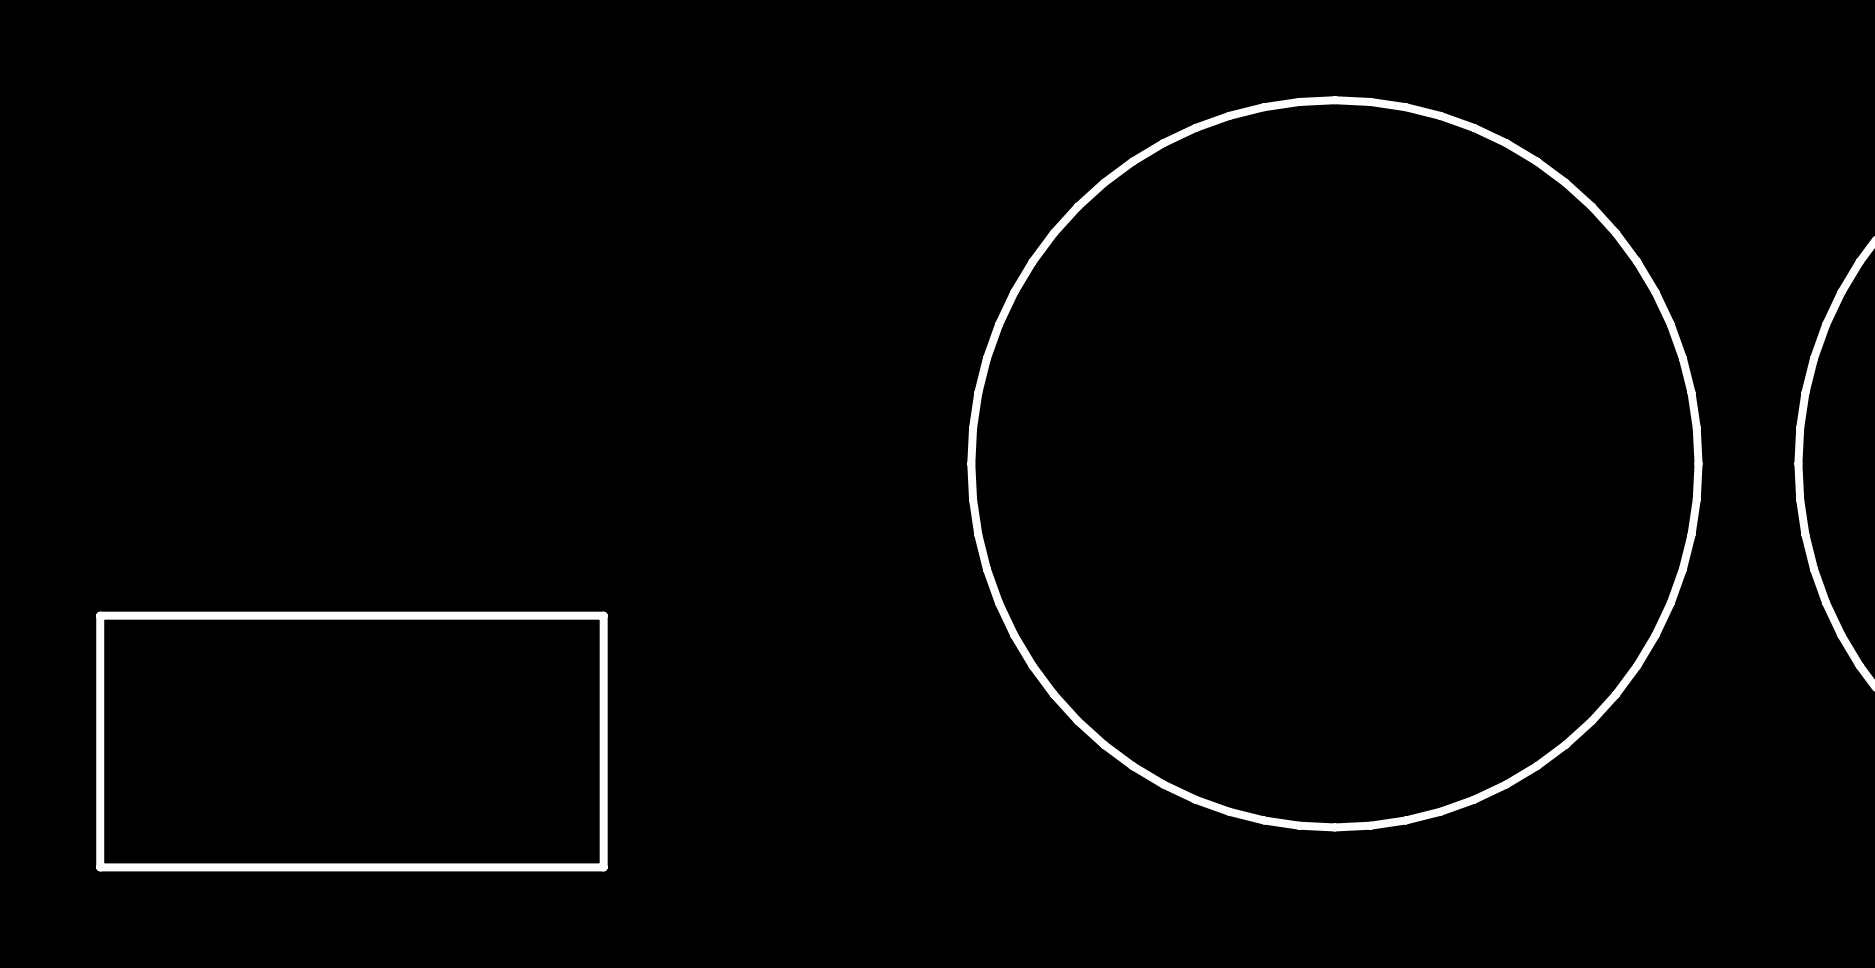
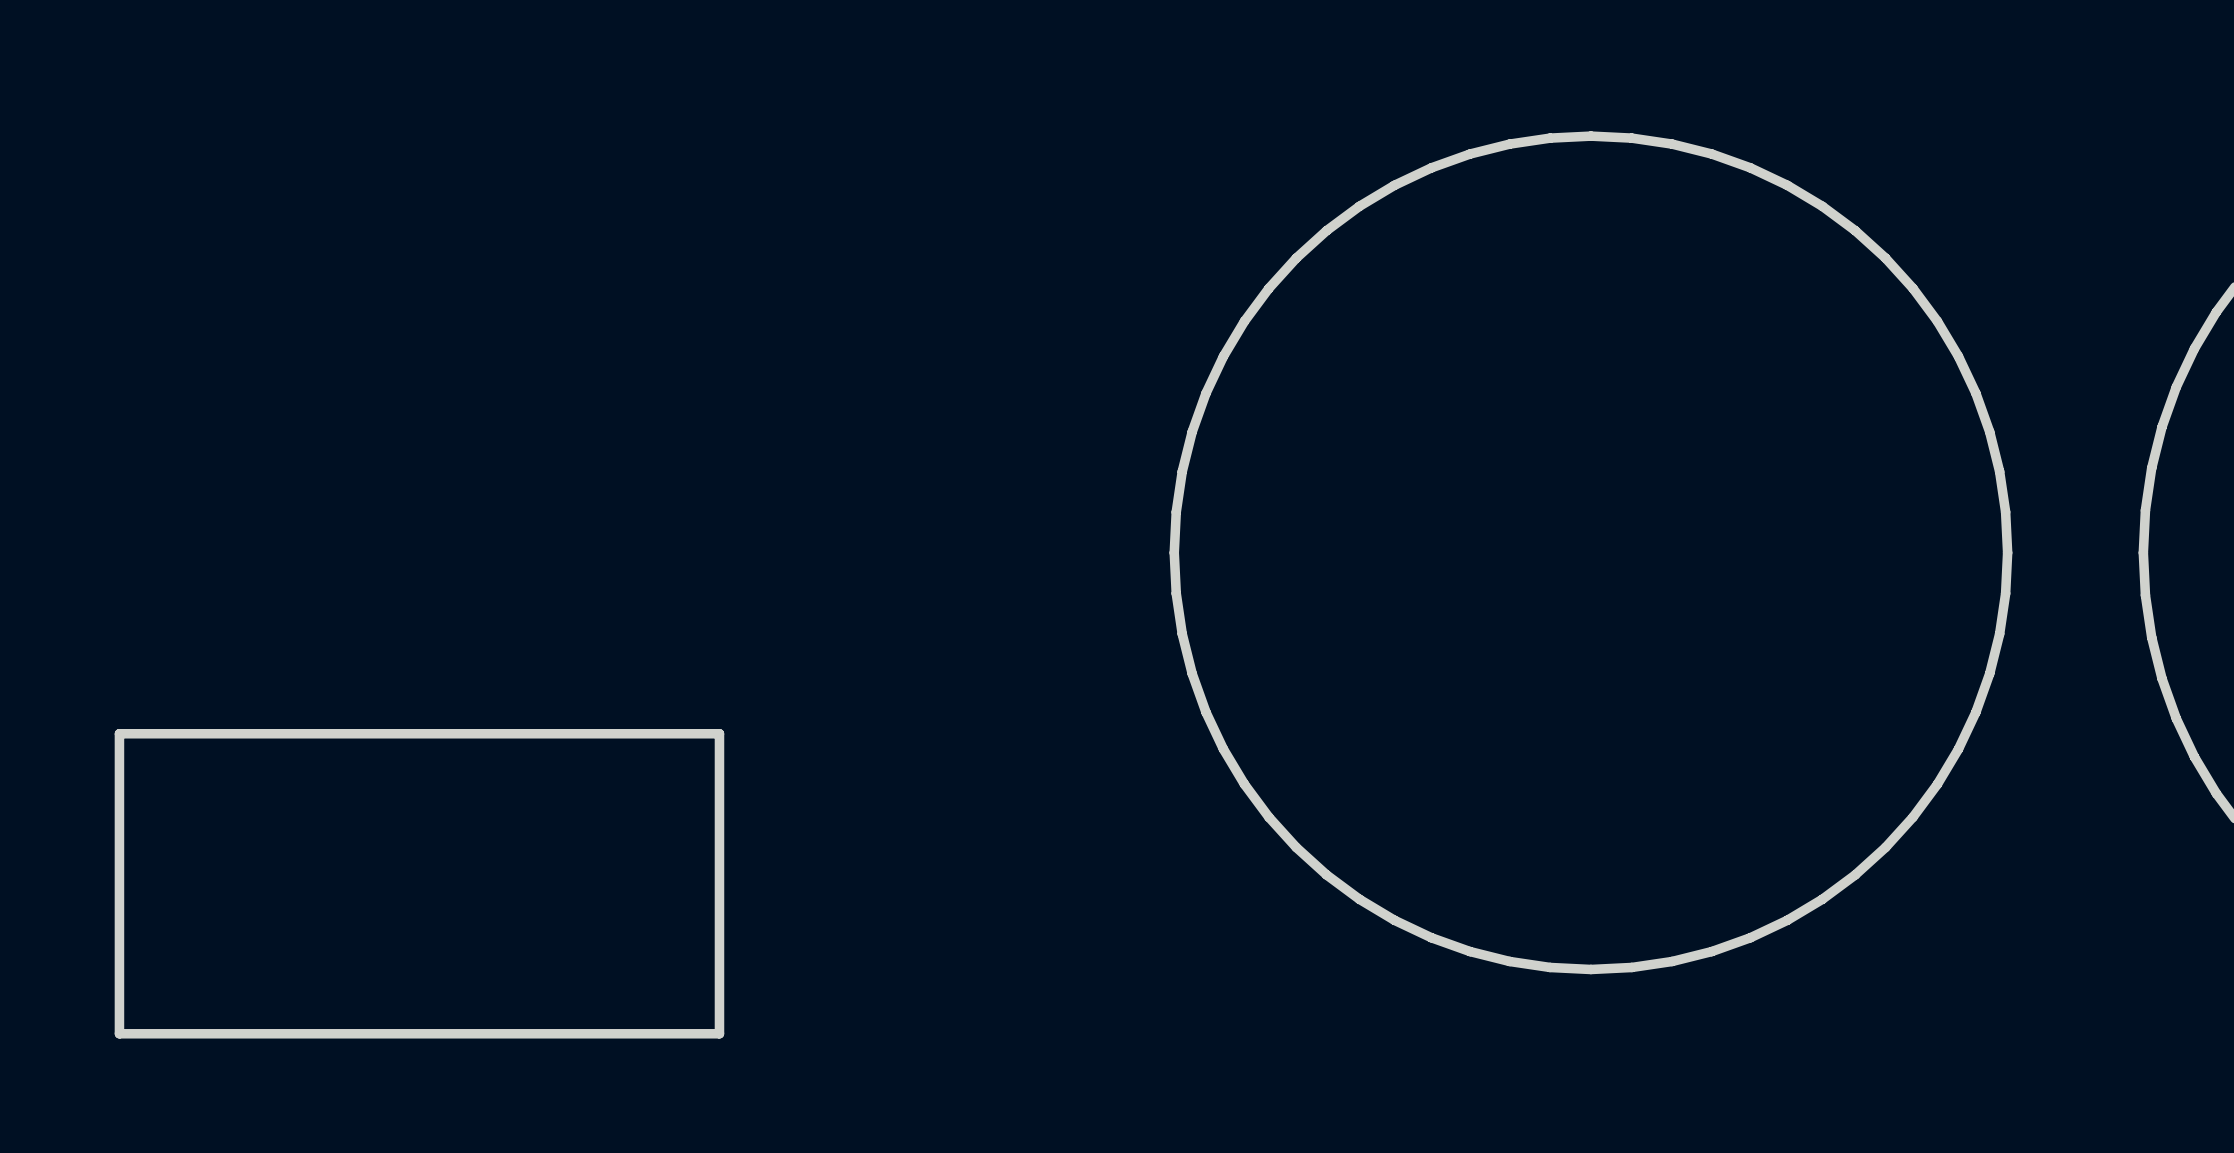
board edge: (1334, 100) (1370, 101) (1405, 107) (1440, 115) (1474, 127) (1506, 143) (1536, 161) (1565, 182) (1592, 206) (1615, 233) (1637, 261) (1655, 292) (1670, 324) (1682, 358) (1691, 392) (1696, 428) (1698, 463) (1696, 499) (1691, 534) (1682, 569) (1670, 602) (1655, 635) (1637, 665) (1615, 694) (1592, 720) (1565, 744) (1536, 766) (1506, 784) (1474, 799) (1440, 811) (1405, 820) (1370, 825) (1334, 827) (1299, 825) (1263, 820) (1229, 811) (1195, 799) (1163, 784) (1132, 766) (1104, 744) (1077, 720) (1053, 694) (1032, 665) (1014, 635) (998, 602) (986, 569) (978, 534) (973, 499) (971, 463) (973, 428) (978, 392) (986, 358) (998, 324) (1014, 292) (1032, 261) (1053, 233) (1077, 206) (1104, 182) (1132, 161) (1163, 143) (1195, 127) (1229, 115) (1263, 107) (1299, 101) (1334, 100) -> (1590, 136) (1631, 138) (1672, 144) (1711, 154) (1750, 167) (1787, 185) (1822, 206) (1855, 230) (1885, 258) (1913, 288) (1937, 321) (1958, 356) (1975, 393) (1989, 431) (1999, 471) (2005, 511) (2007, 552) (2005, 593) (1999, 634) (1989, 673) (1975, 712) (1958, 749) (1937, 784) (1913, 817) (1885, 847) (1855, 874) (1822, 899) (1787, 920) (1750, 937) (1711, 951) (1672, 961) (1631, 967) (1590, 969) (1550, 967) (1509, 961) (1469, 951) (1431, 937) (1394, 920) (1359, 899) (1326, 874) (1296, 847) (1268, 817) (1244, 784) (1223, 749) (1205, 712) (1192, 673) (1182, 634) (1176, 593) (1174, 552) (1176, 511) (1182, 471) (1192, 431) (1205, 393) (1223, 356) (1244, 321) (1268, 288) (1296, 258) (1326, 230) (1359, 206) (1394, 185) (1431, 167) (1469, 154) (1509, 144) (1550, 138) (1590, 136)

